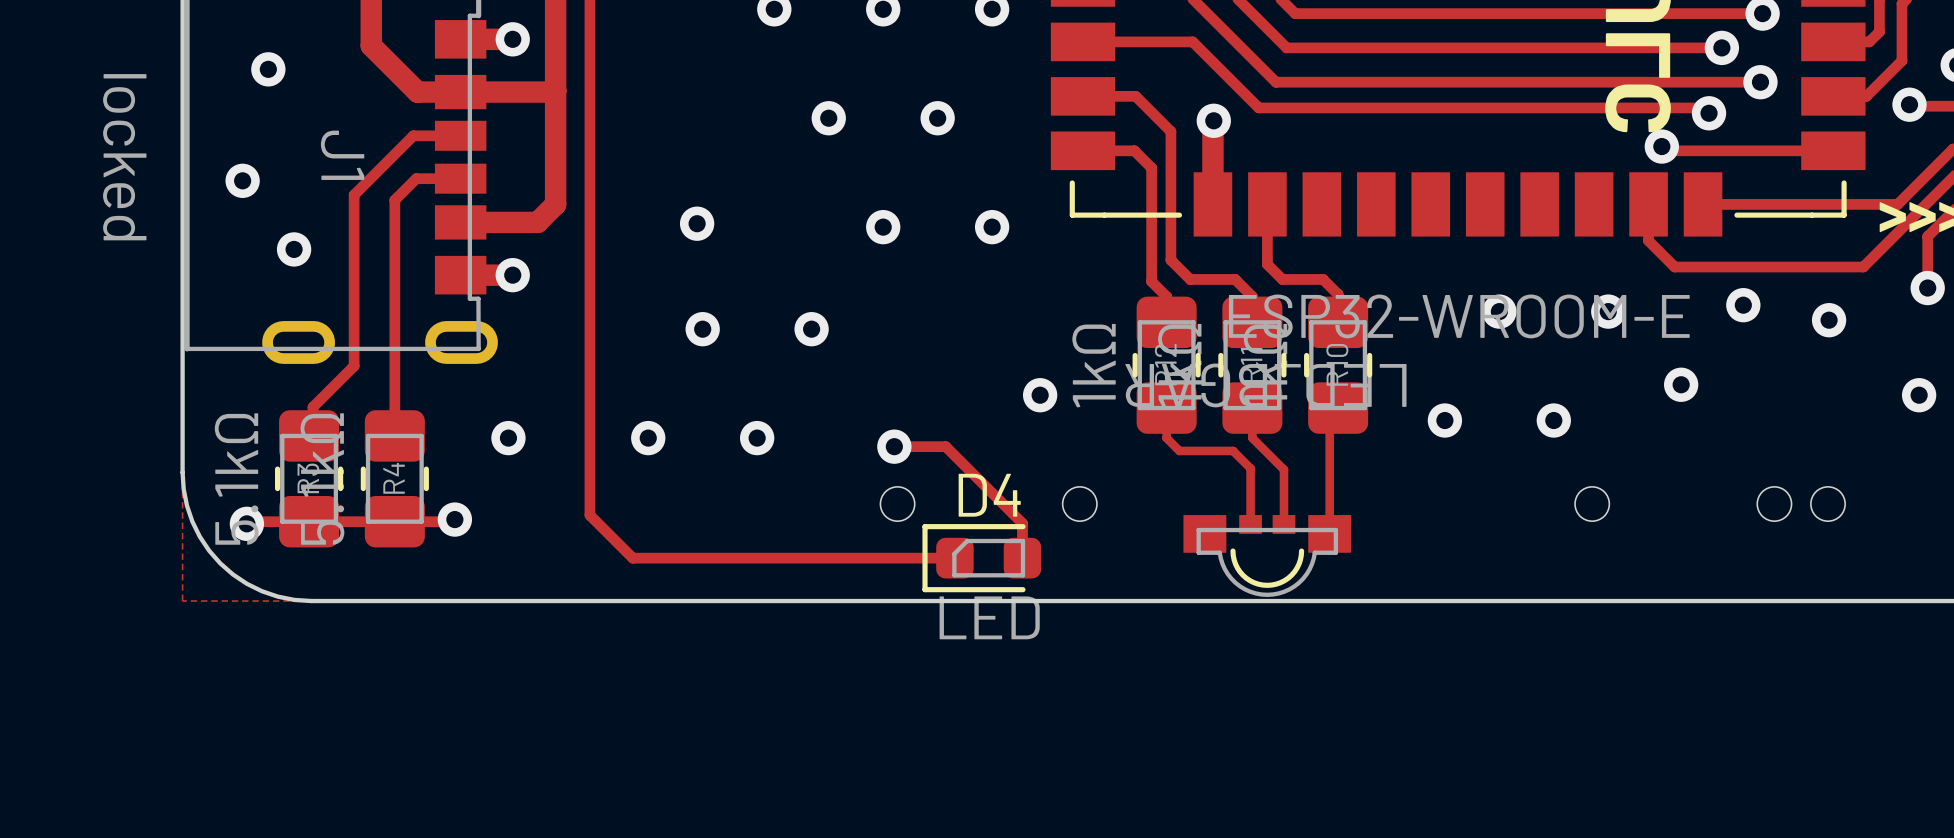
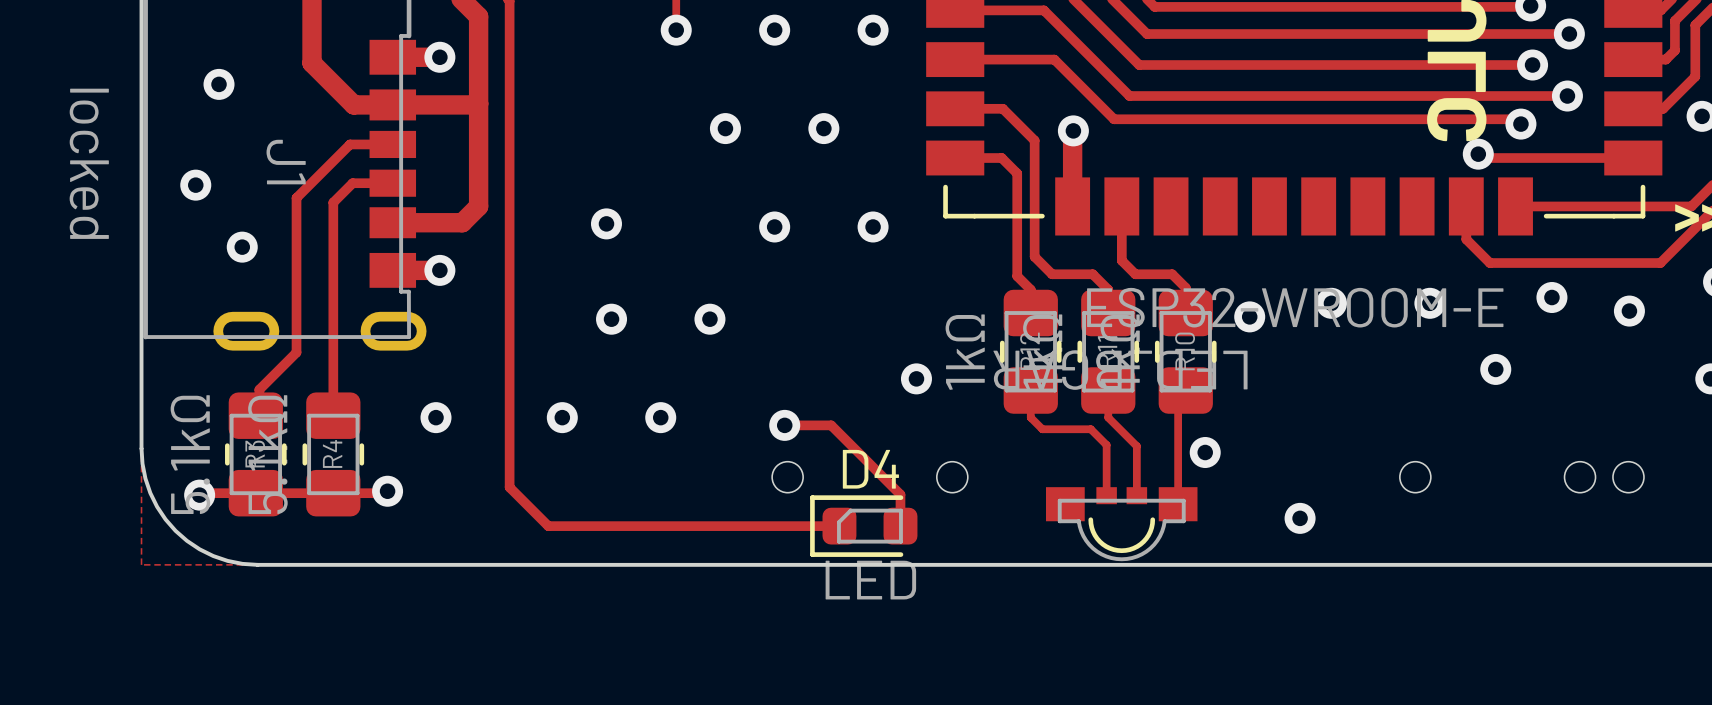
via: none -> (1249, 316)
via: (1444, 420) -> none
via: (1553, 420) -> none
via: none -> (1205, 452)
via: none -> (1300, 518)

